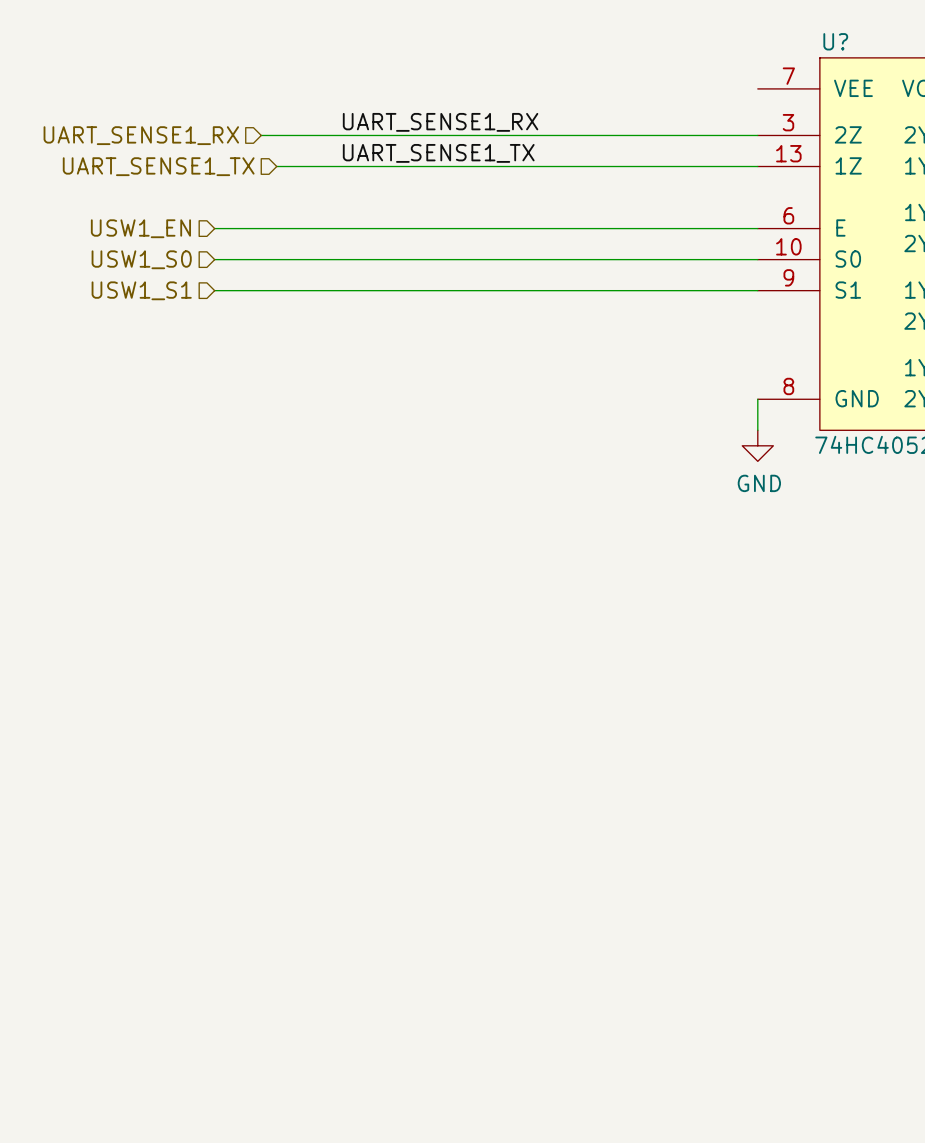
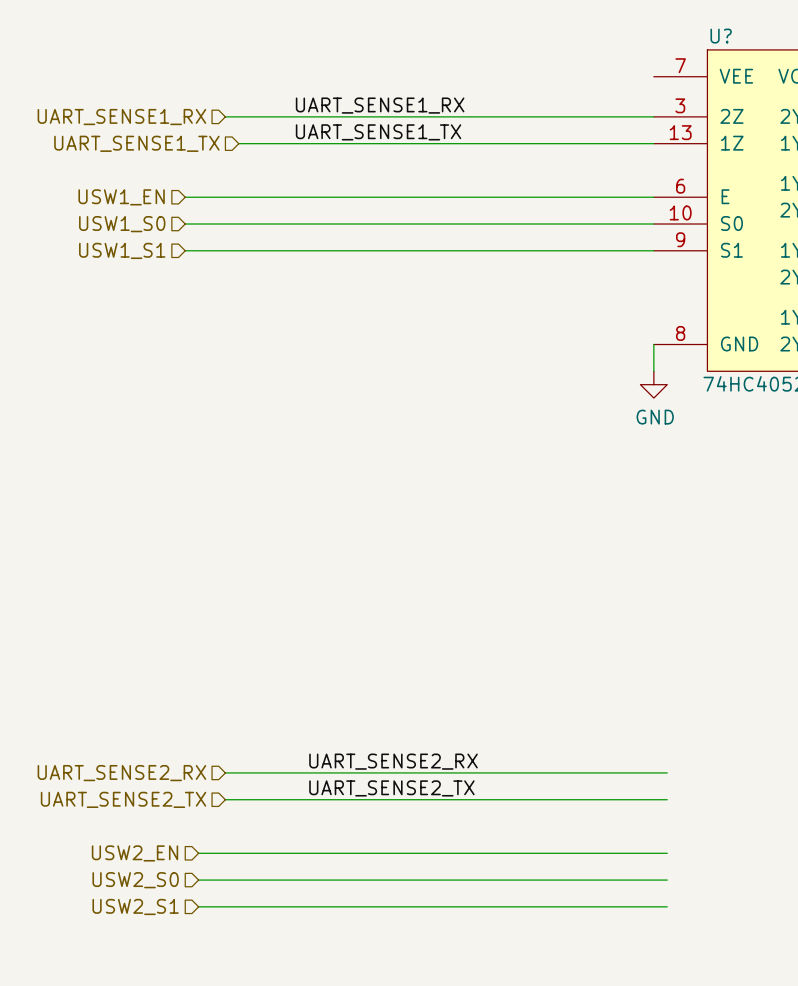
label: none -> UART_SENSE2_RX (393, 761)
hierarchical label: none -> UART_SENSE2_RX (121, 773)
wire: none -> (225, 772) (667, 772)
label: none -> UART_SENSE2_TX (391, 788)
wire: none -> (225, 799) (667, 799)
hierarchical label: none -> UART_SENSE2_TX (123, 799)
wire: none -> (198, 853) (667, 853)
hierarchical label: none -> USW2_EN (134, 853)
wire: none -> (198, 880) (667, 880)
hierarchical label: none -> USW2_S0 (135, 880)
hierarchical label: none -> USW2_S1 (135, 906)
wire: none -> (198, 906) (667, 906)

